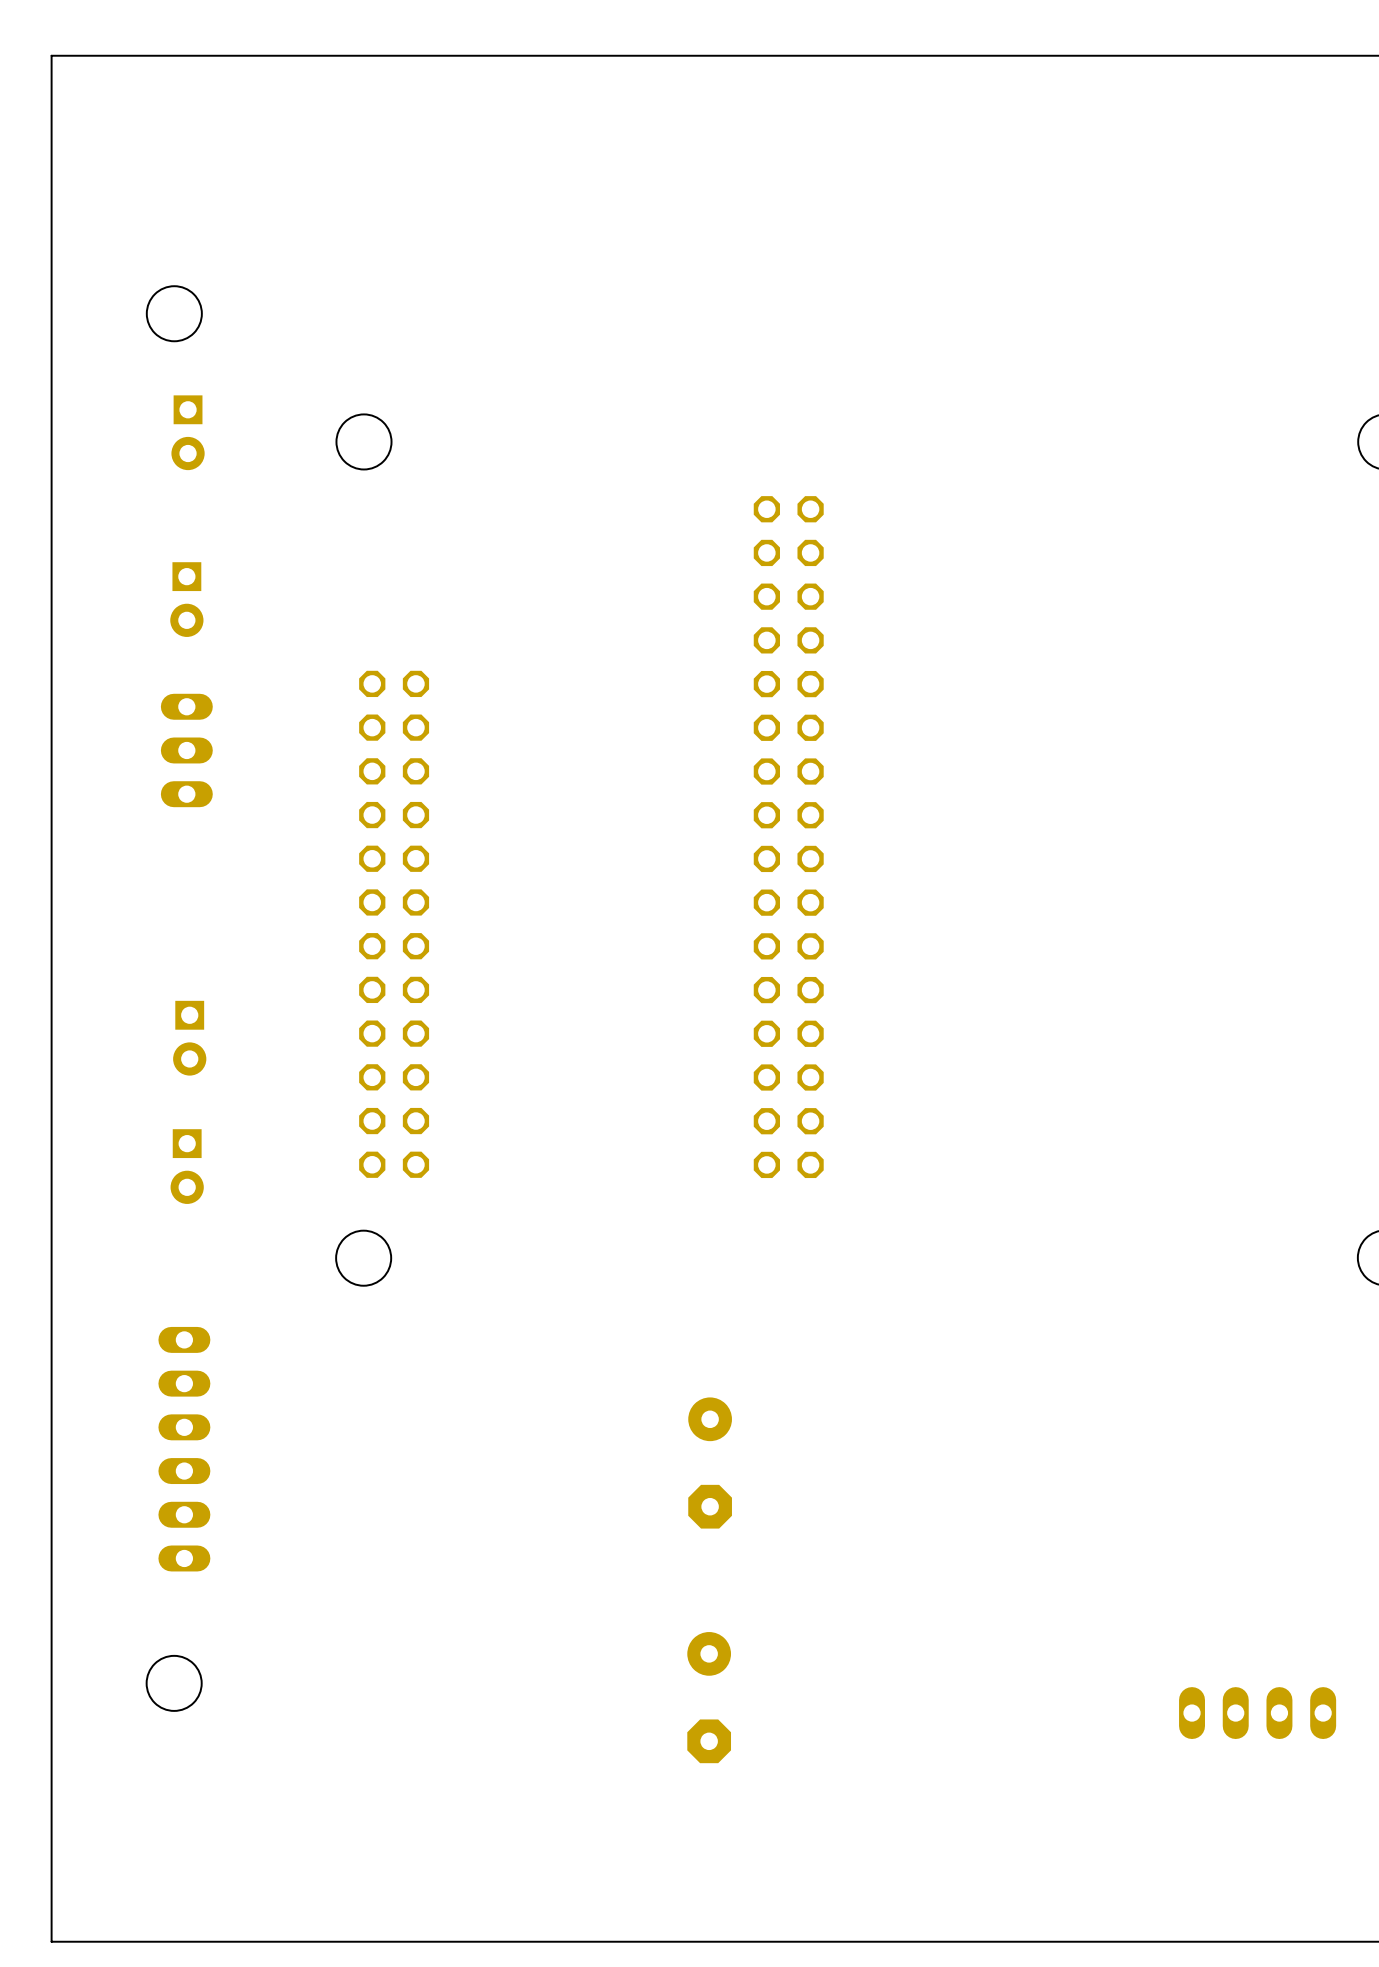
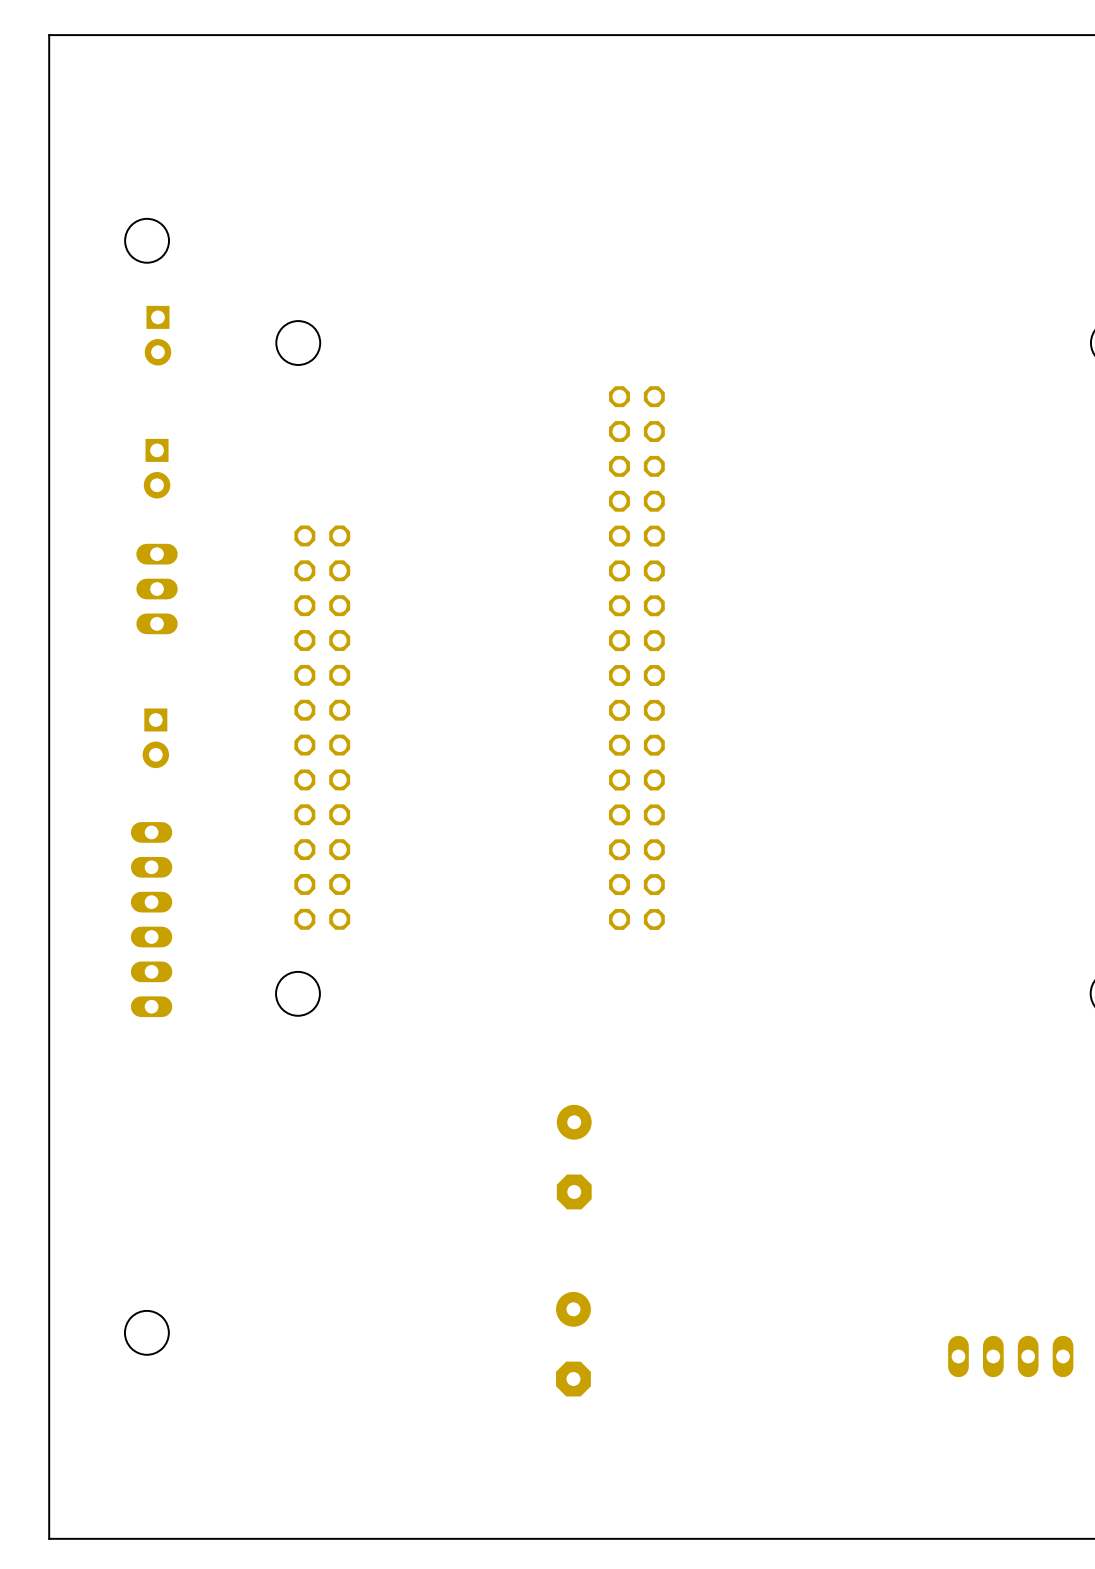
part position: (189, 1038) -> (155, 738)
part footprint: [170, 1129, 204, 1204] -> [130, 822, 173, 1018]
part: (184, 1449) -> none

